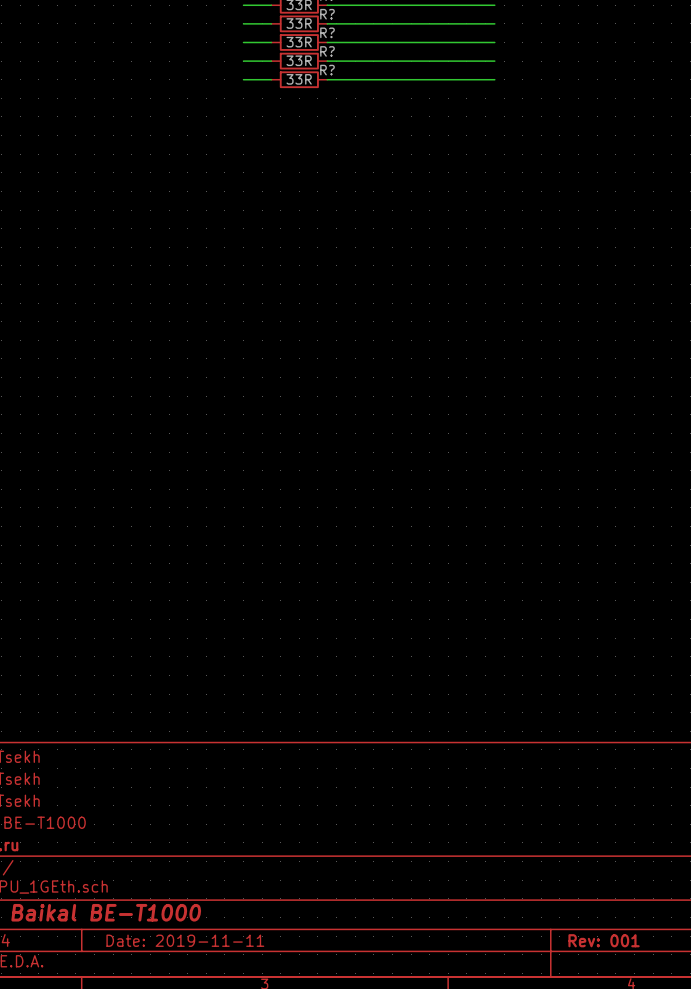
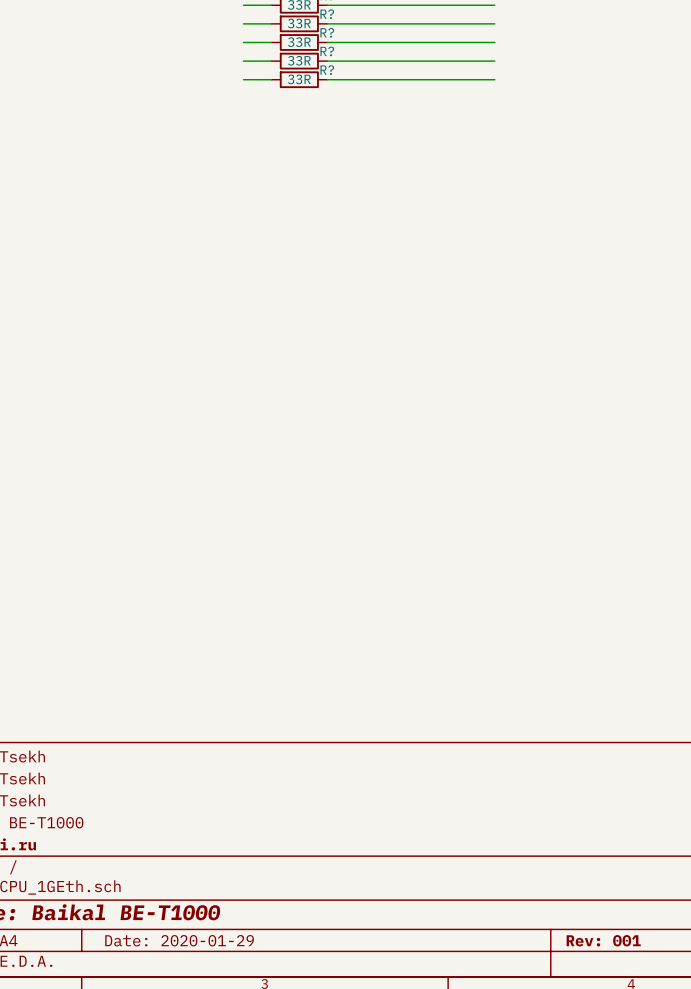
title block: Date: 2019-11-11 (185, 940) -> Date: 2020-01-29 (179, 940)

